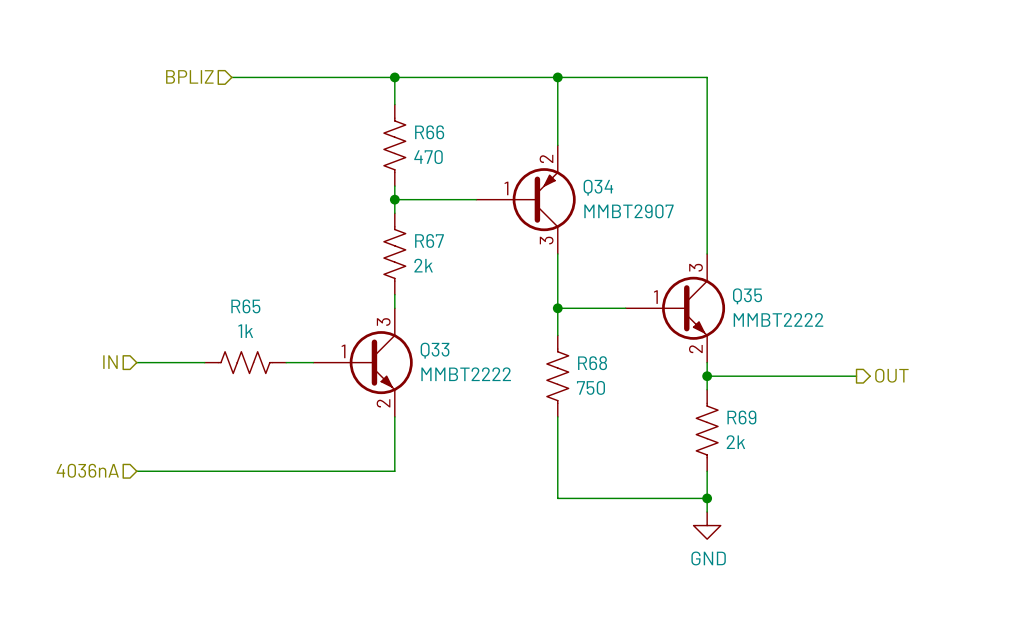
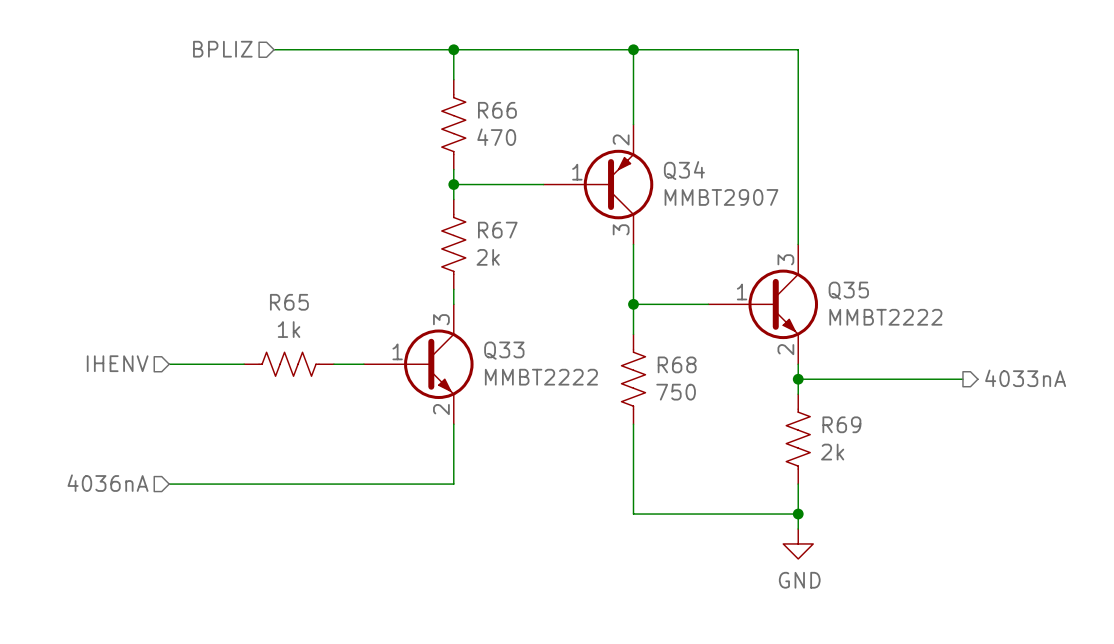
hierarchical label: IN (110, 362) -> IHENV (117, 363)
hierarchical label: OUT (891, 375) -> 4033nA (1025, 378)

